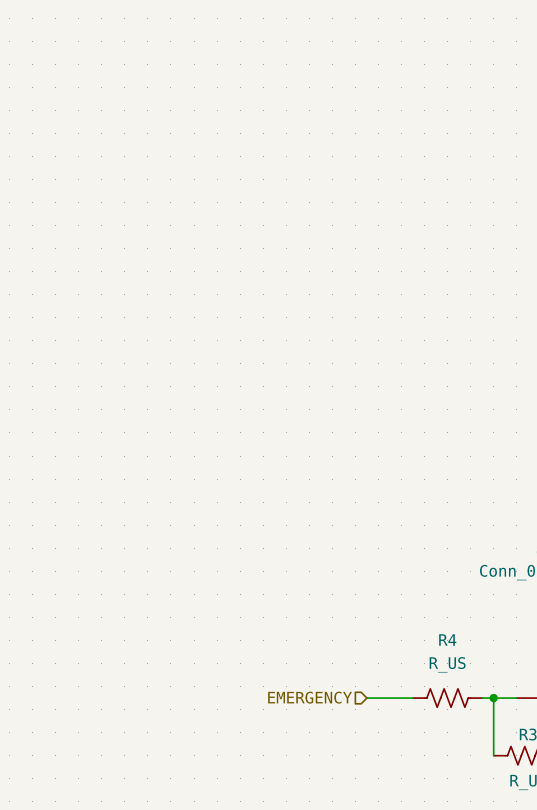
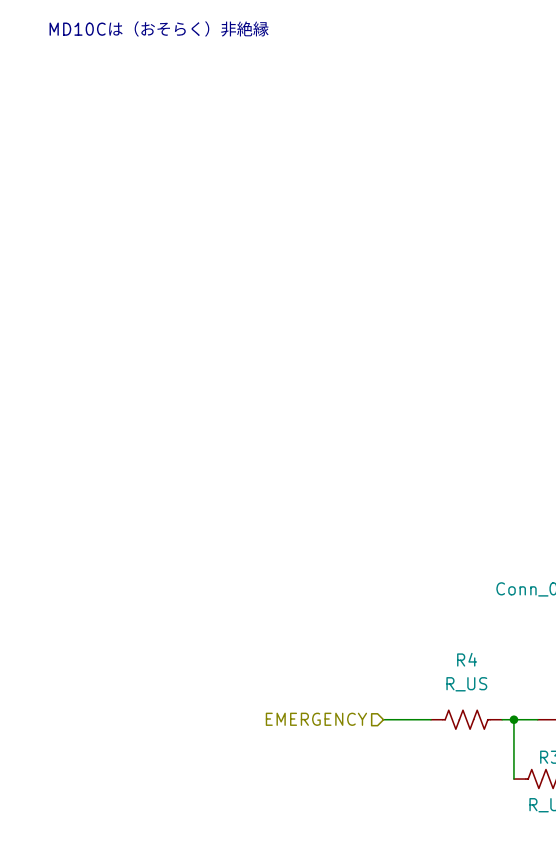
text: none -> MD10Cは（おそらく）非絶縁 (159, 28)

